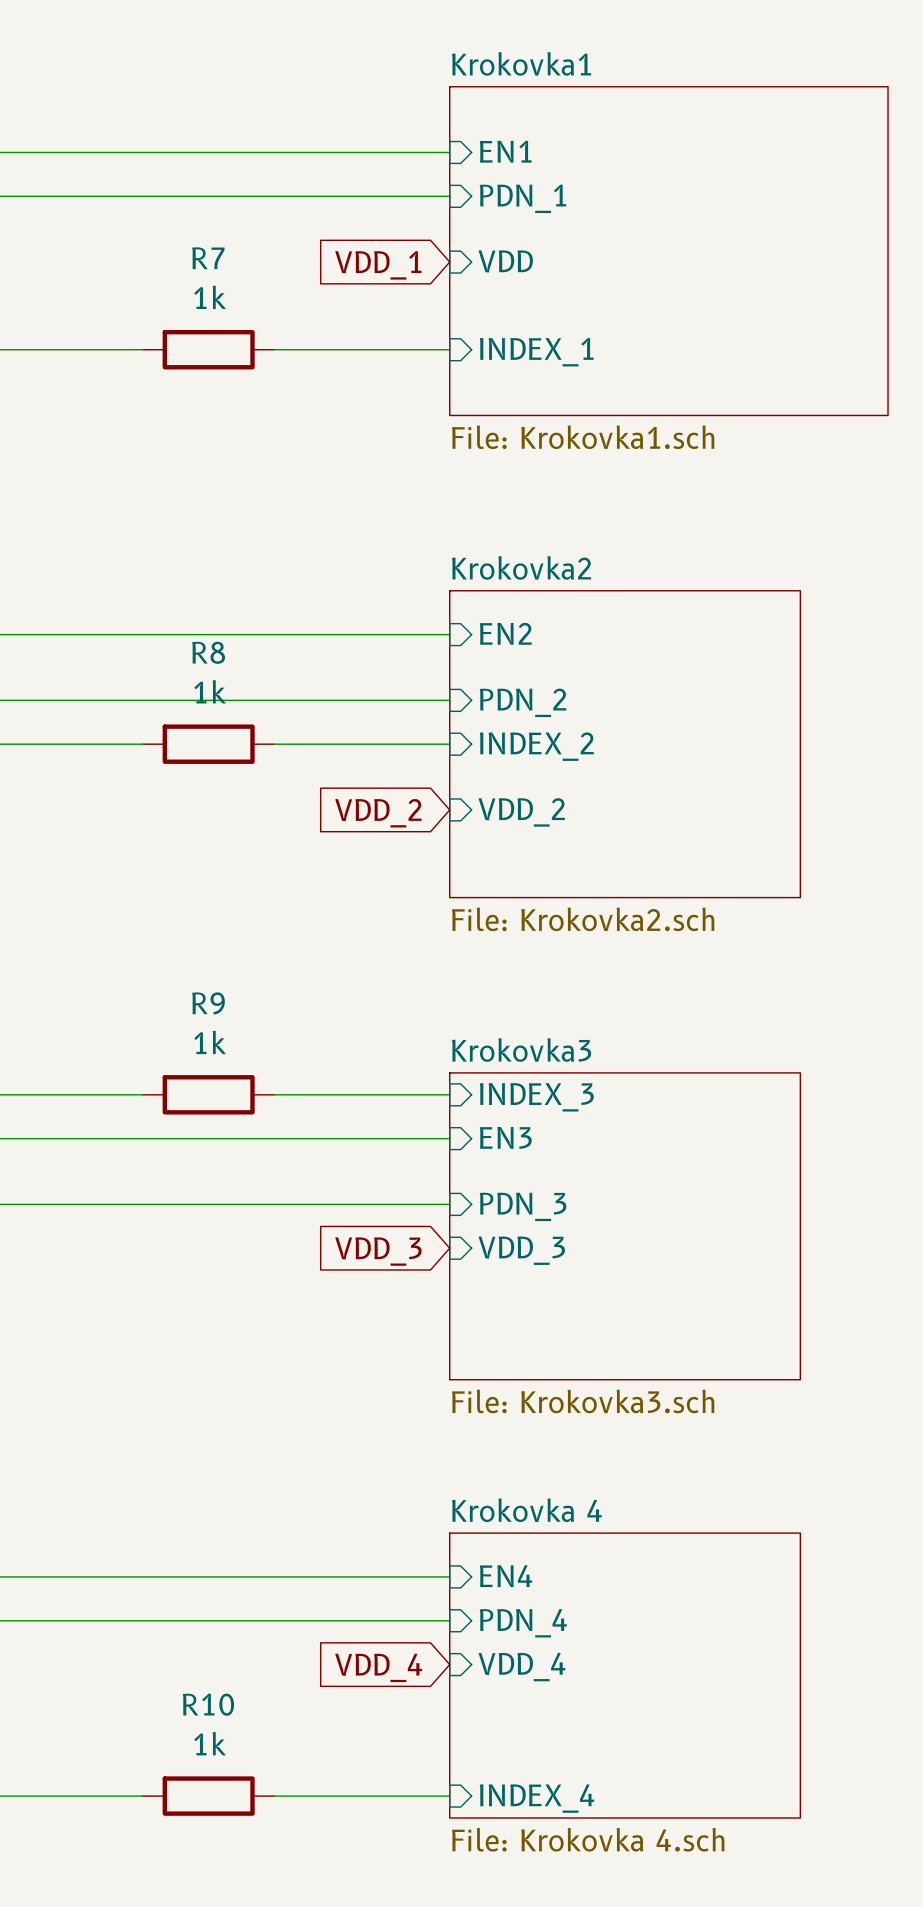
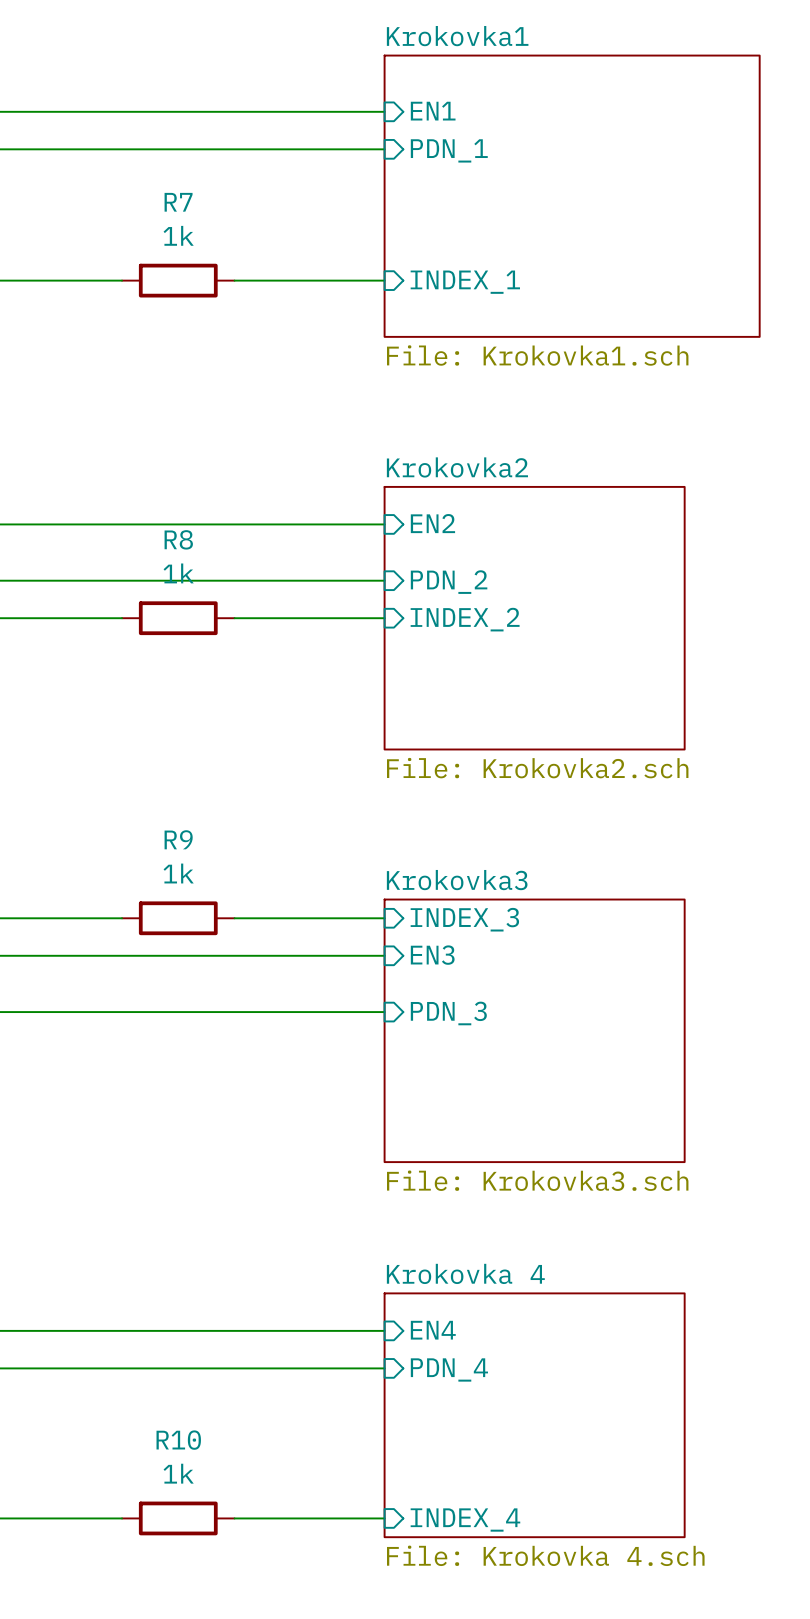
sheet pin: VDD (505, 261) -> none
global label: VDD_1 (378, 265) -> none
sheet pin: VDD_2 (521, 812) -> none
global label: VDD_2 (378, 813) -> none
sheet pin: VDD_3 (521, 1250) -> none
global label: VDD_3 (378, 1251) -> none
global label: VDD_4 (378, 1667) -> none
sheet pin: VDD_4 (522, 1667) -> none

